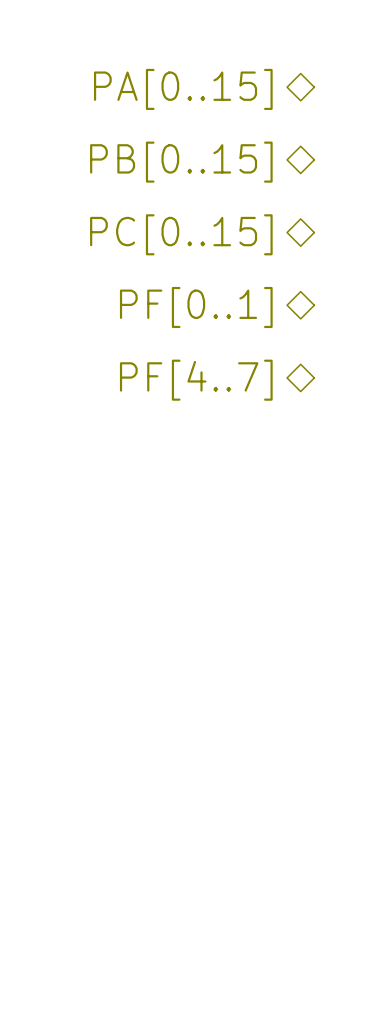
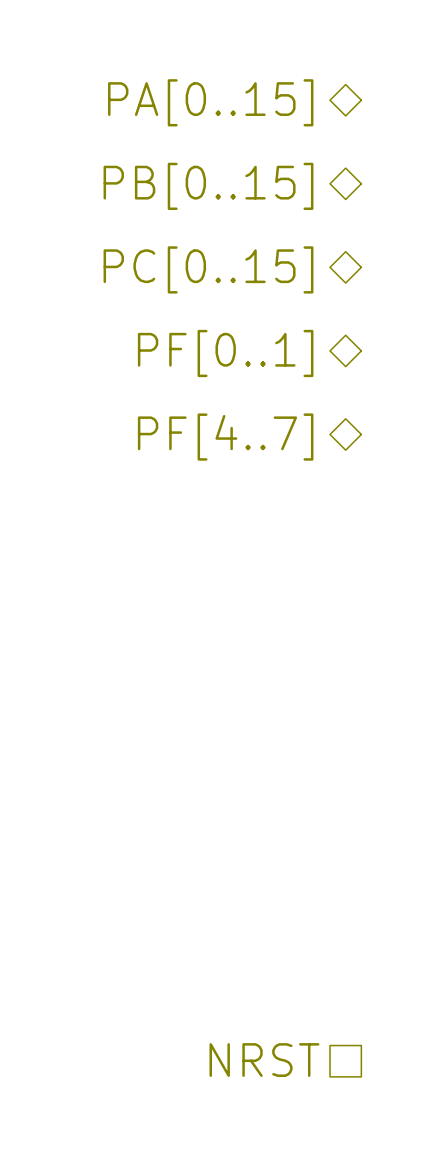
hierarchical label: none -> NRST (264, 1060)

